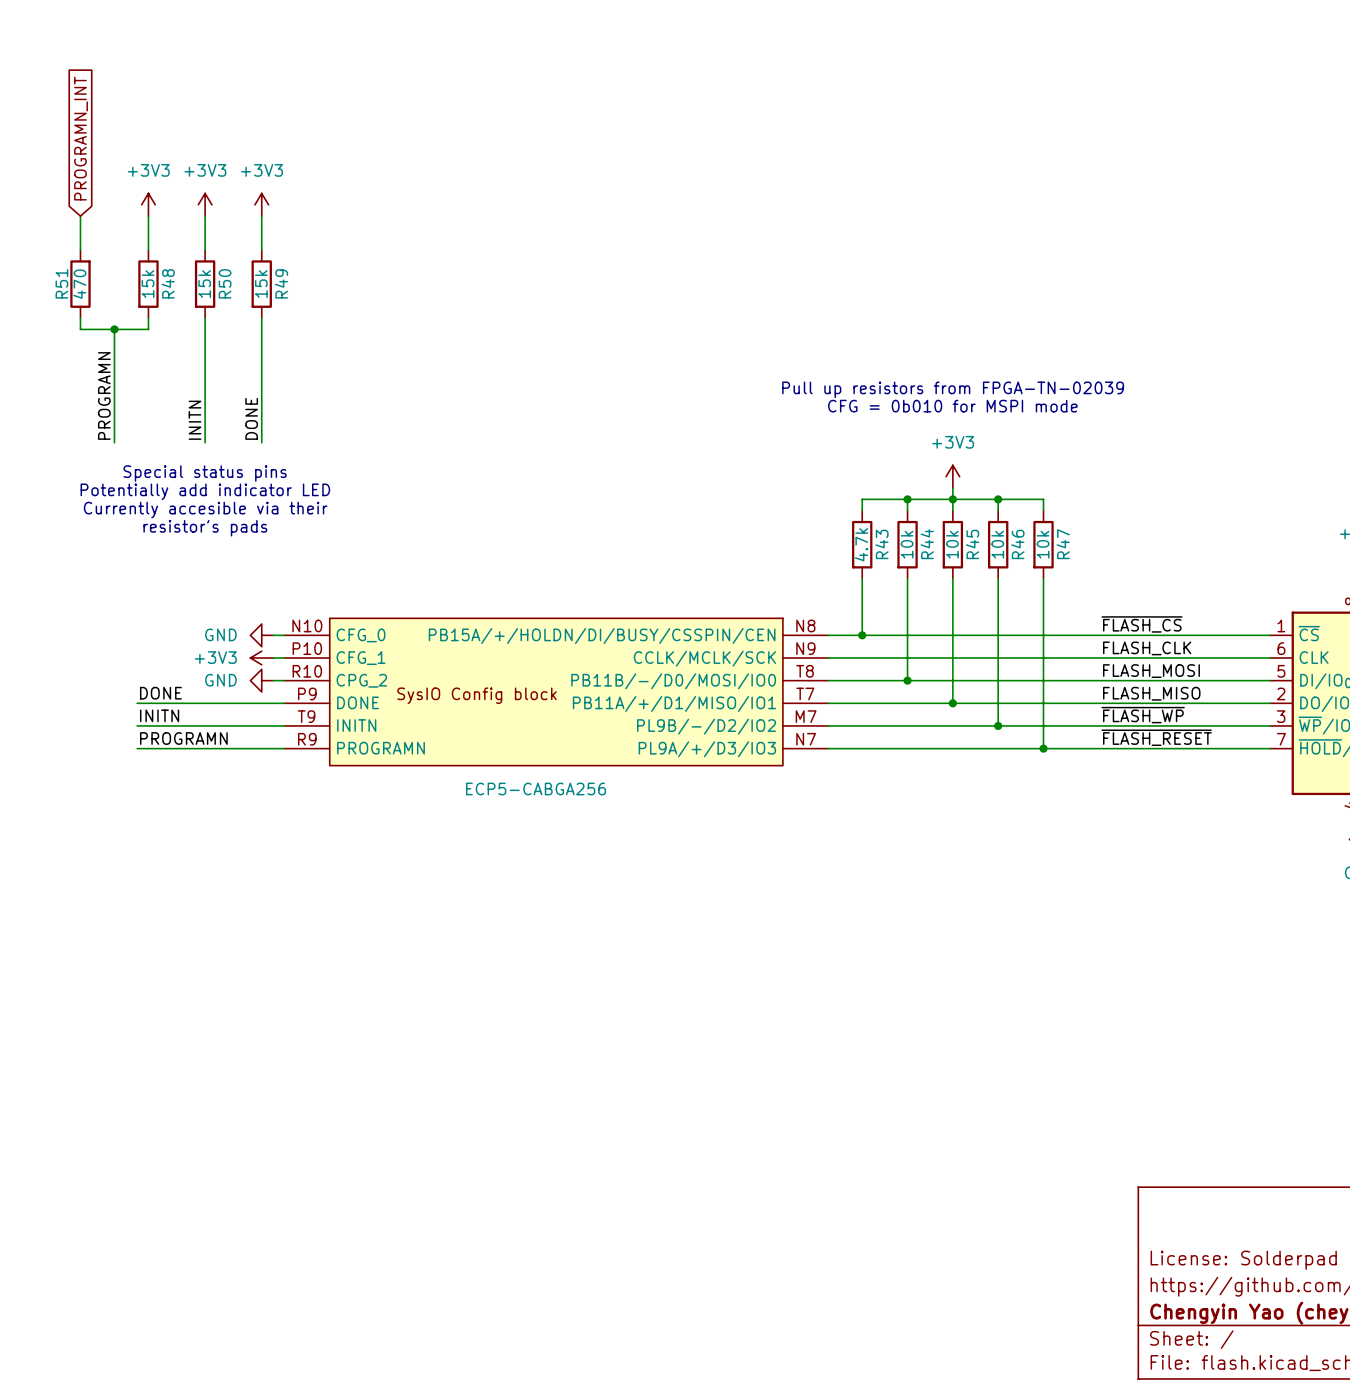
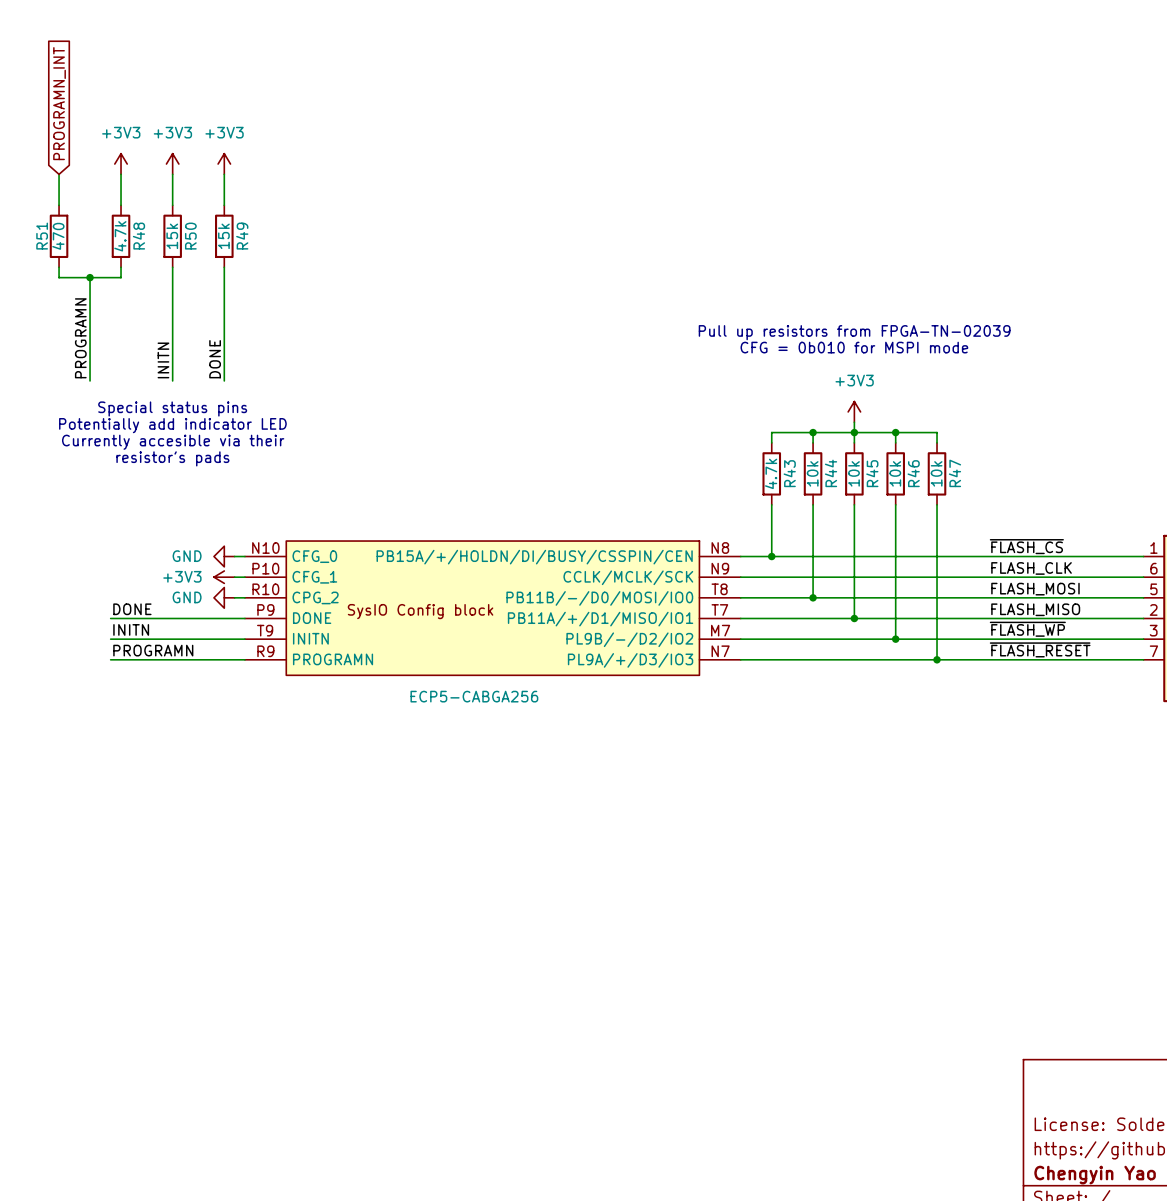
R48 value: 15k (148, 284) -> 4.7k (120, 236)

